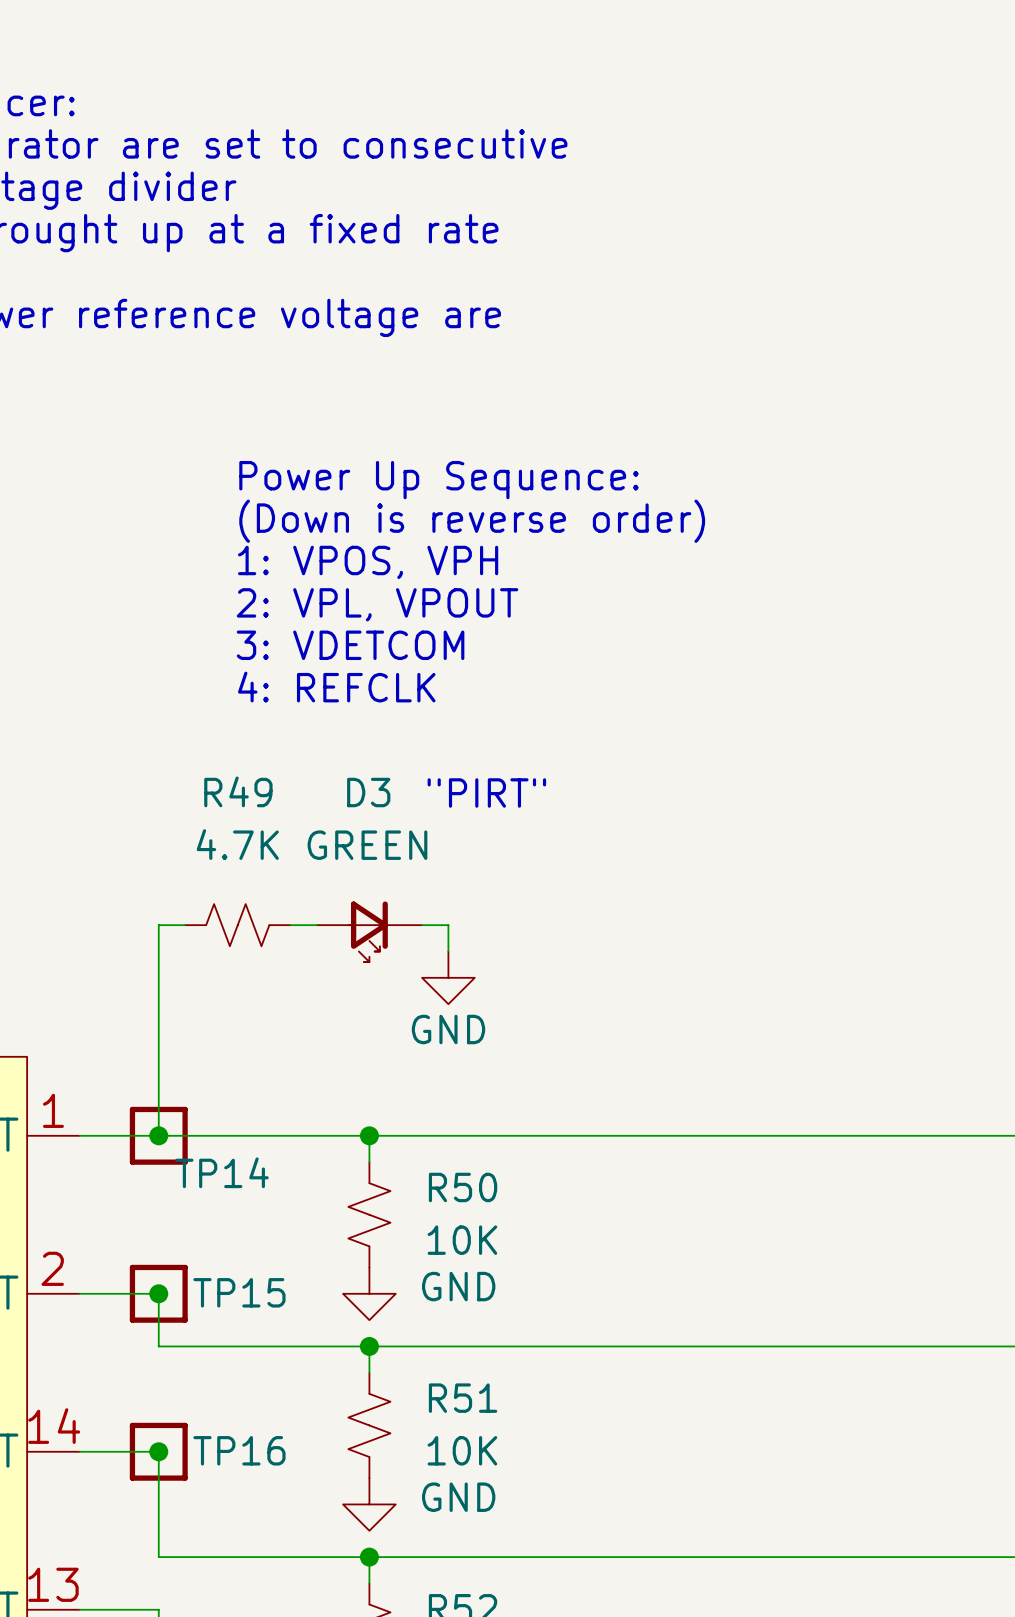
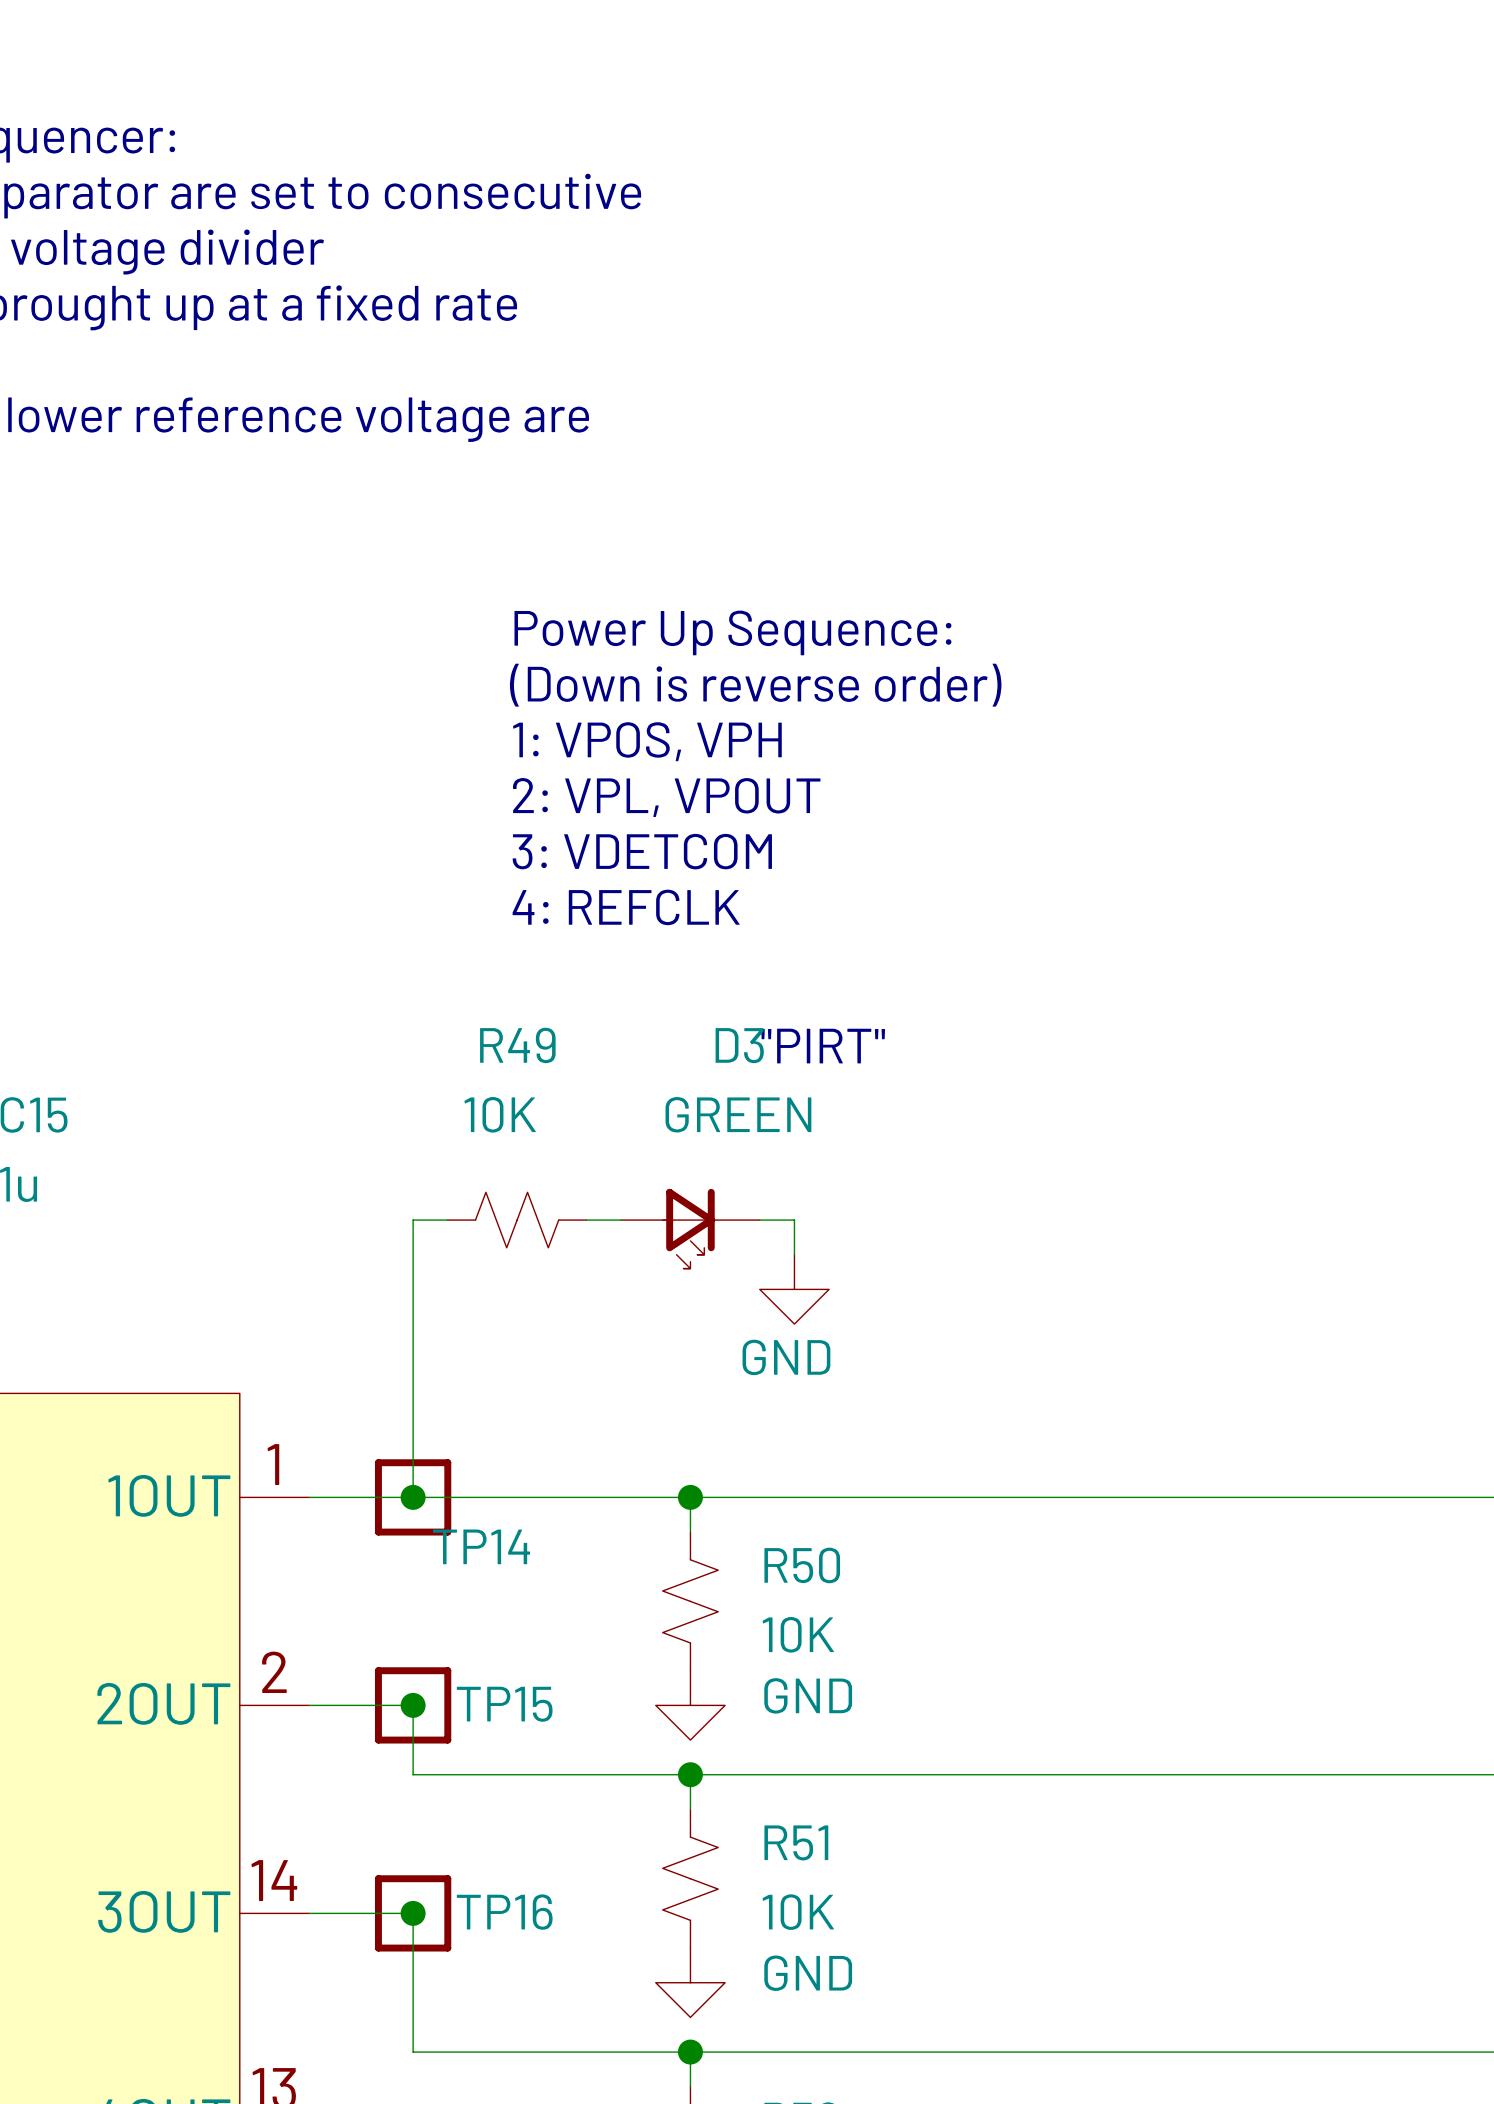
D3 name position: D3 (368, 792) -> D3 (739, 1045)
R49 value: 4.7K (237, 844) -> 10K (500, 1114)
D3 value position: GREEN (367, 845) -> GREEN (738, 1114)

